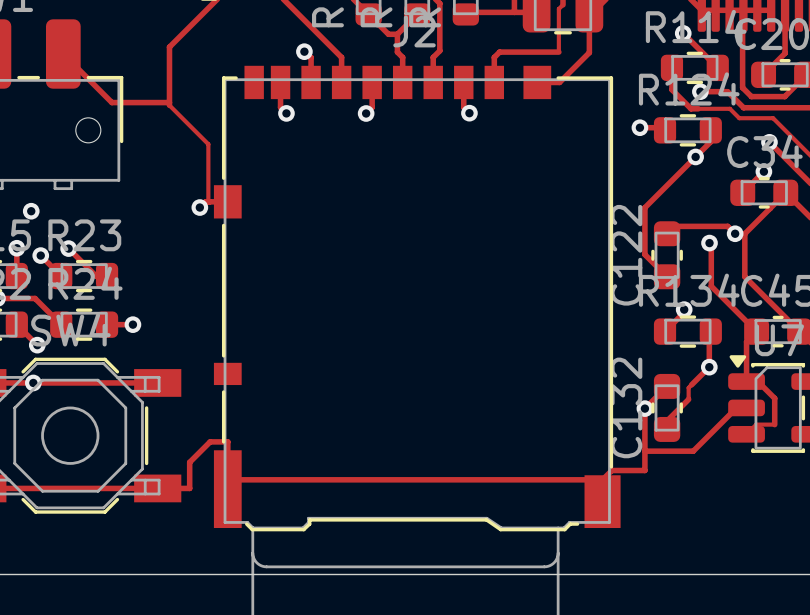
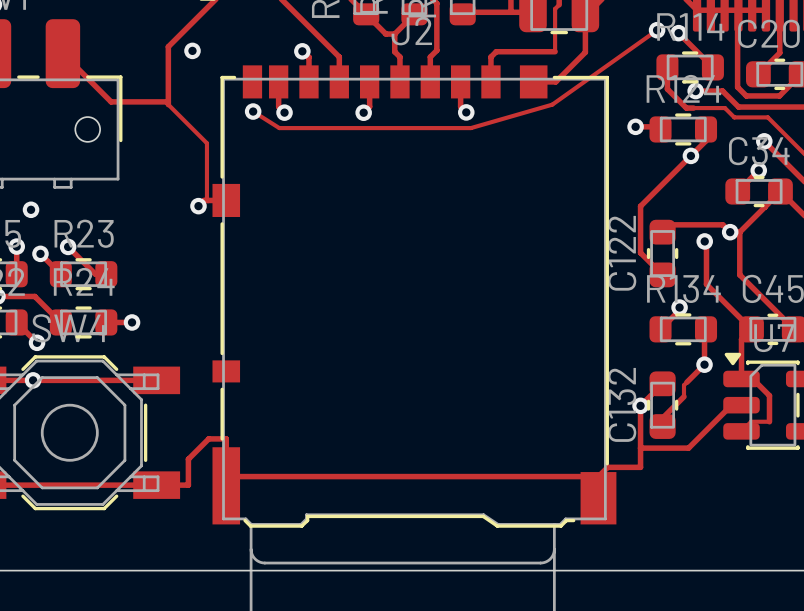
track: none -> (657, 30) (552, 104) (470, 128) (279, 128) (253, 111)
via: none -> (657, 30)
via: none -> (192, 50)
via: none -> (253, 111)

